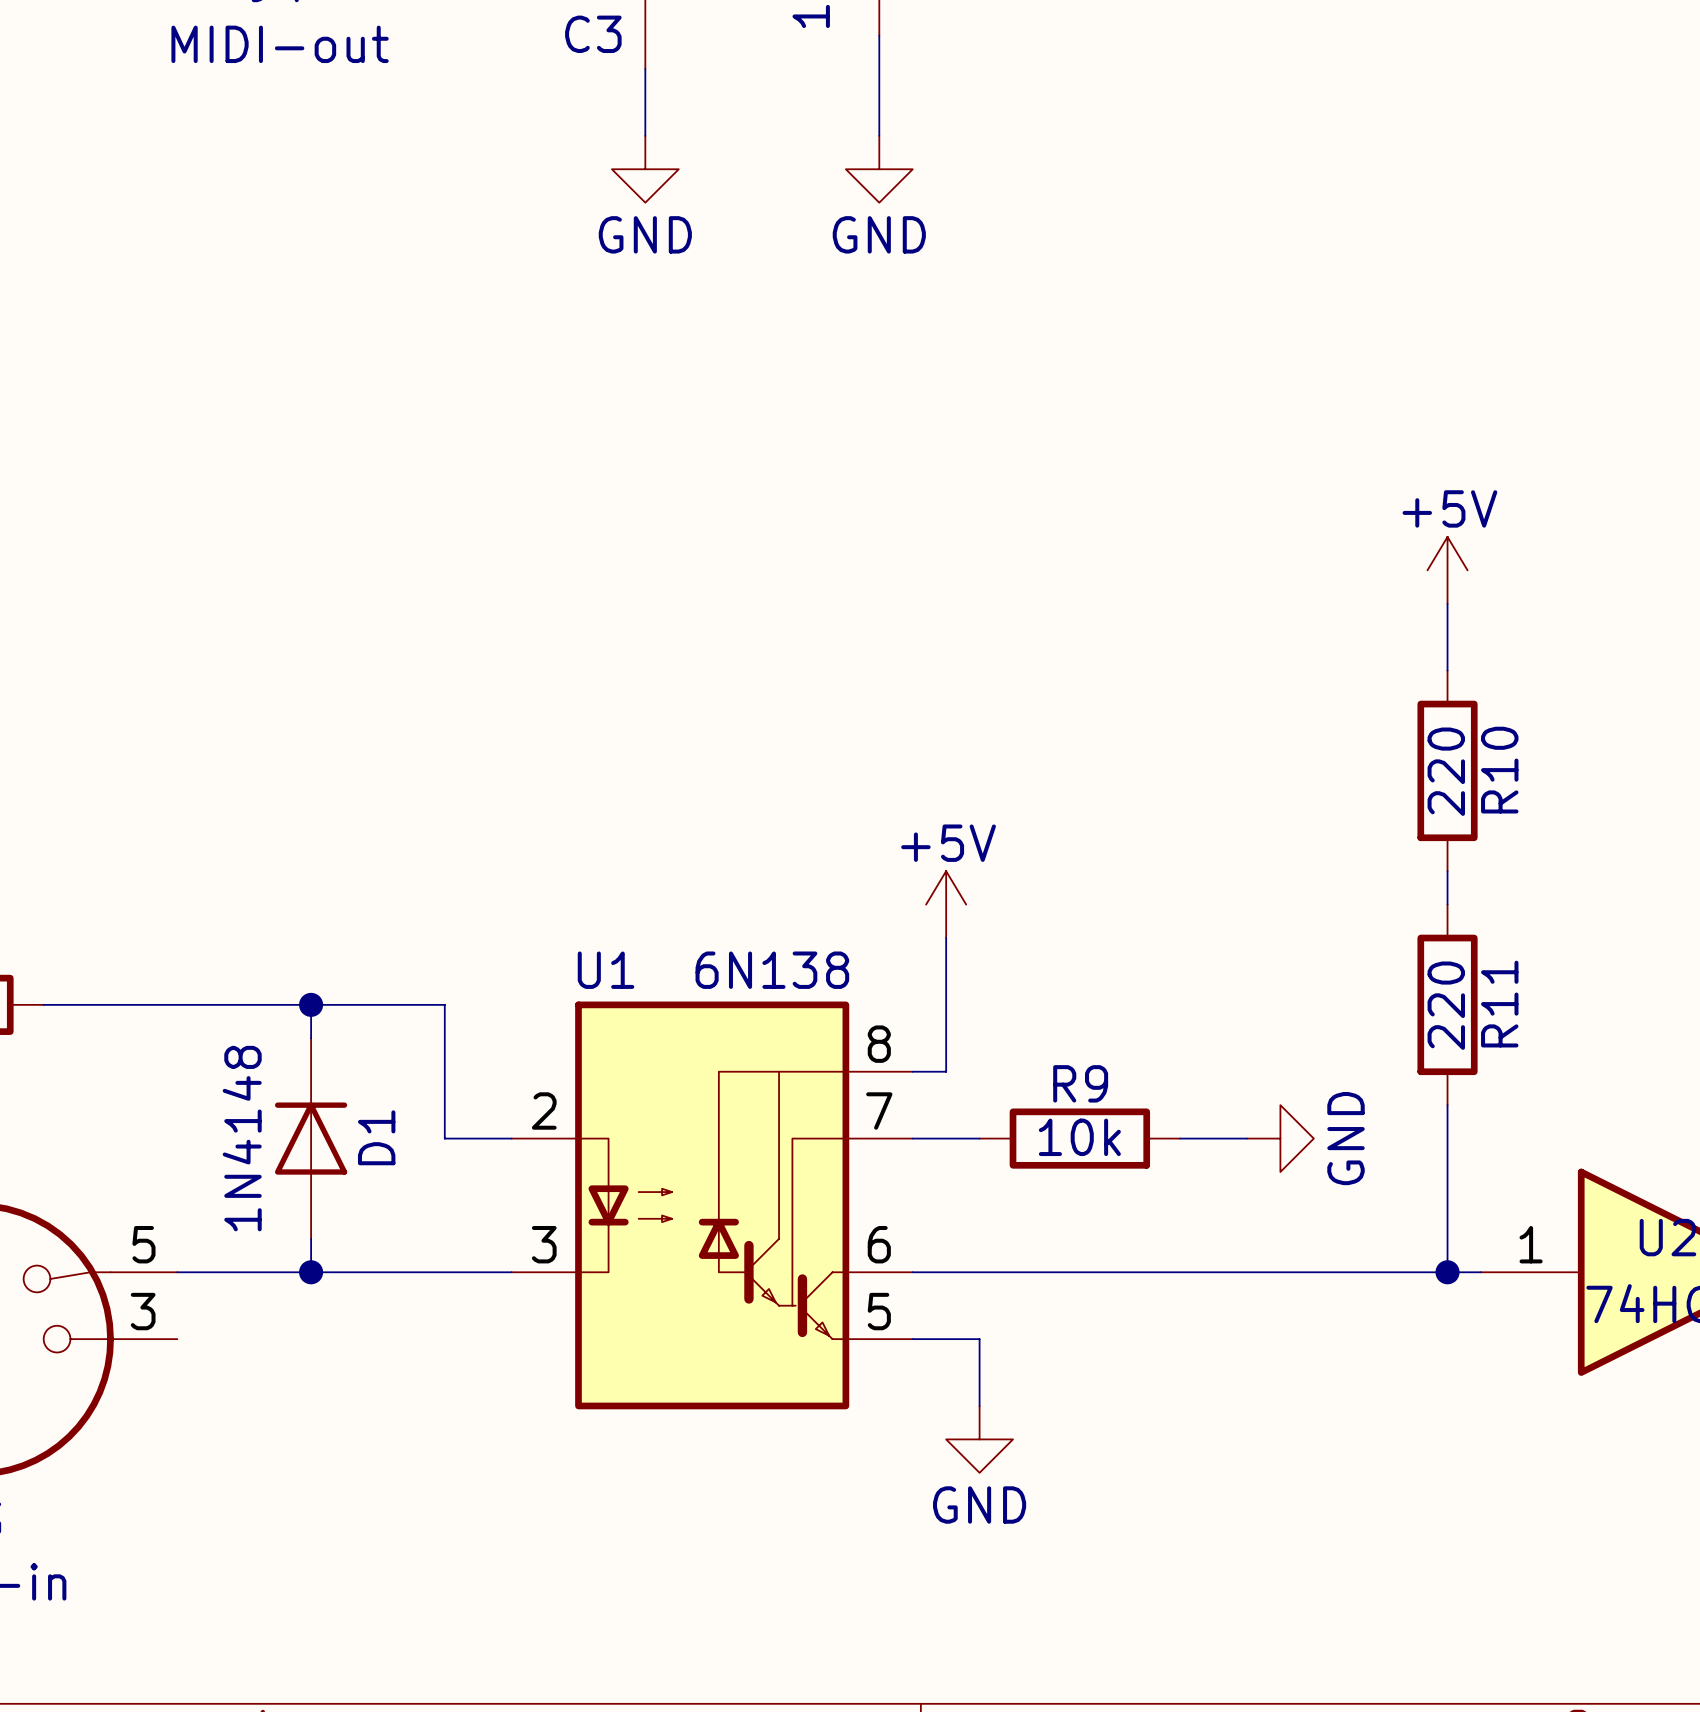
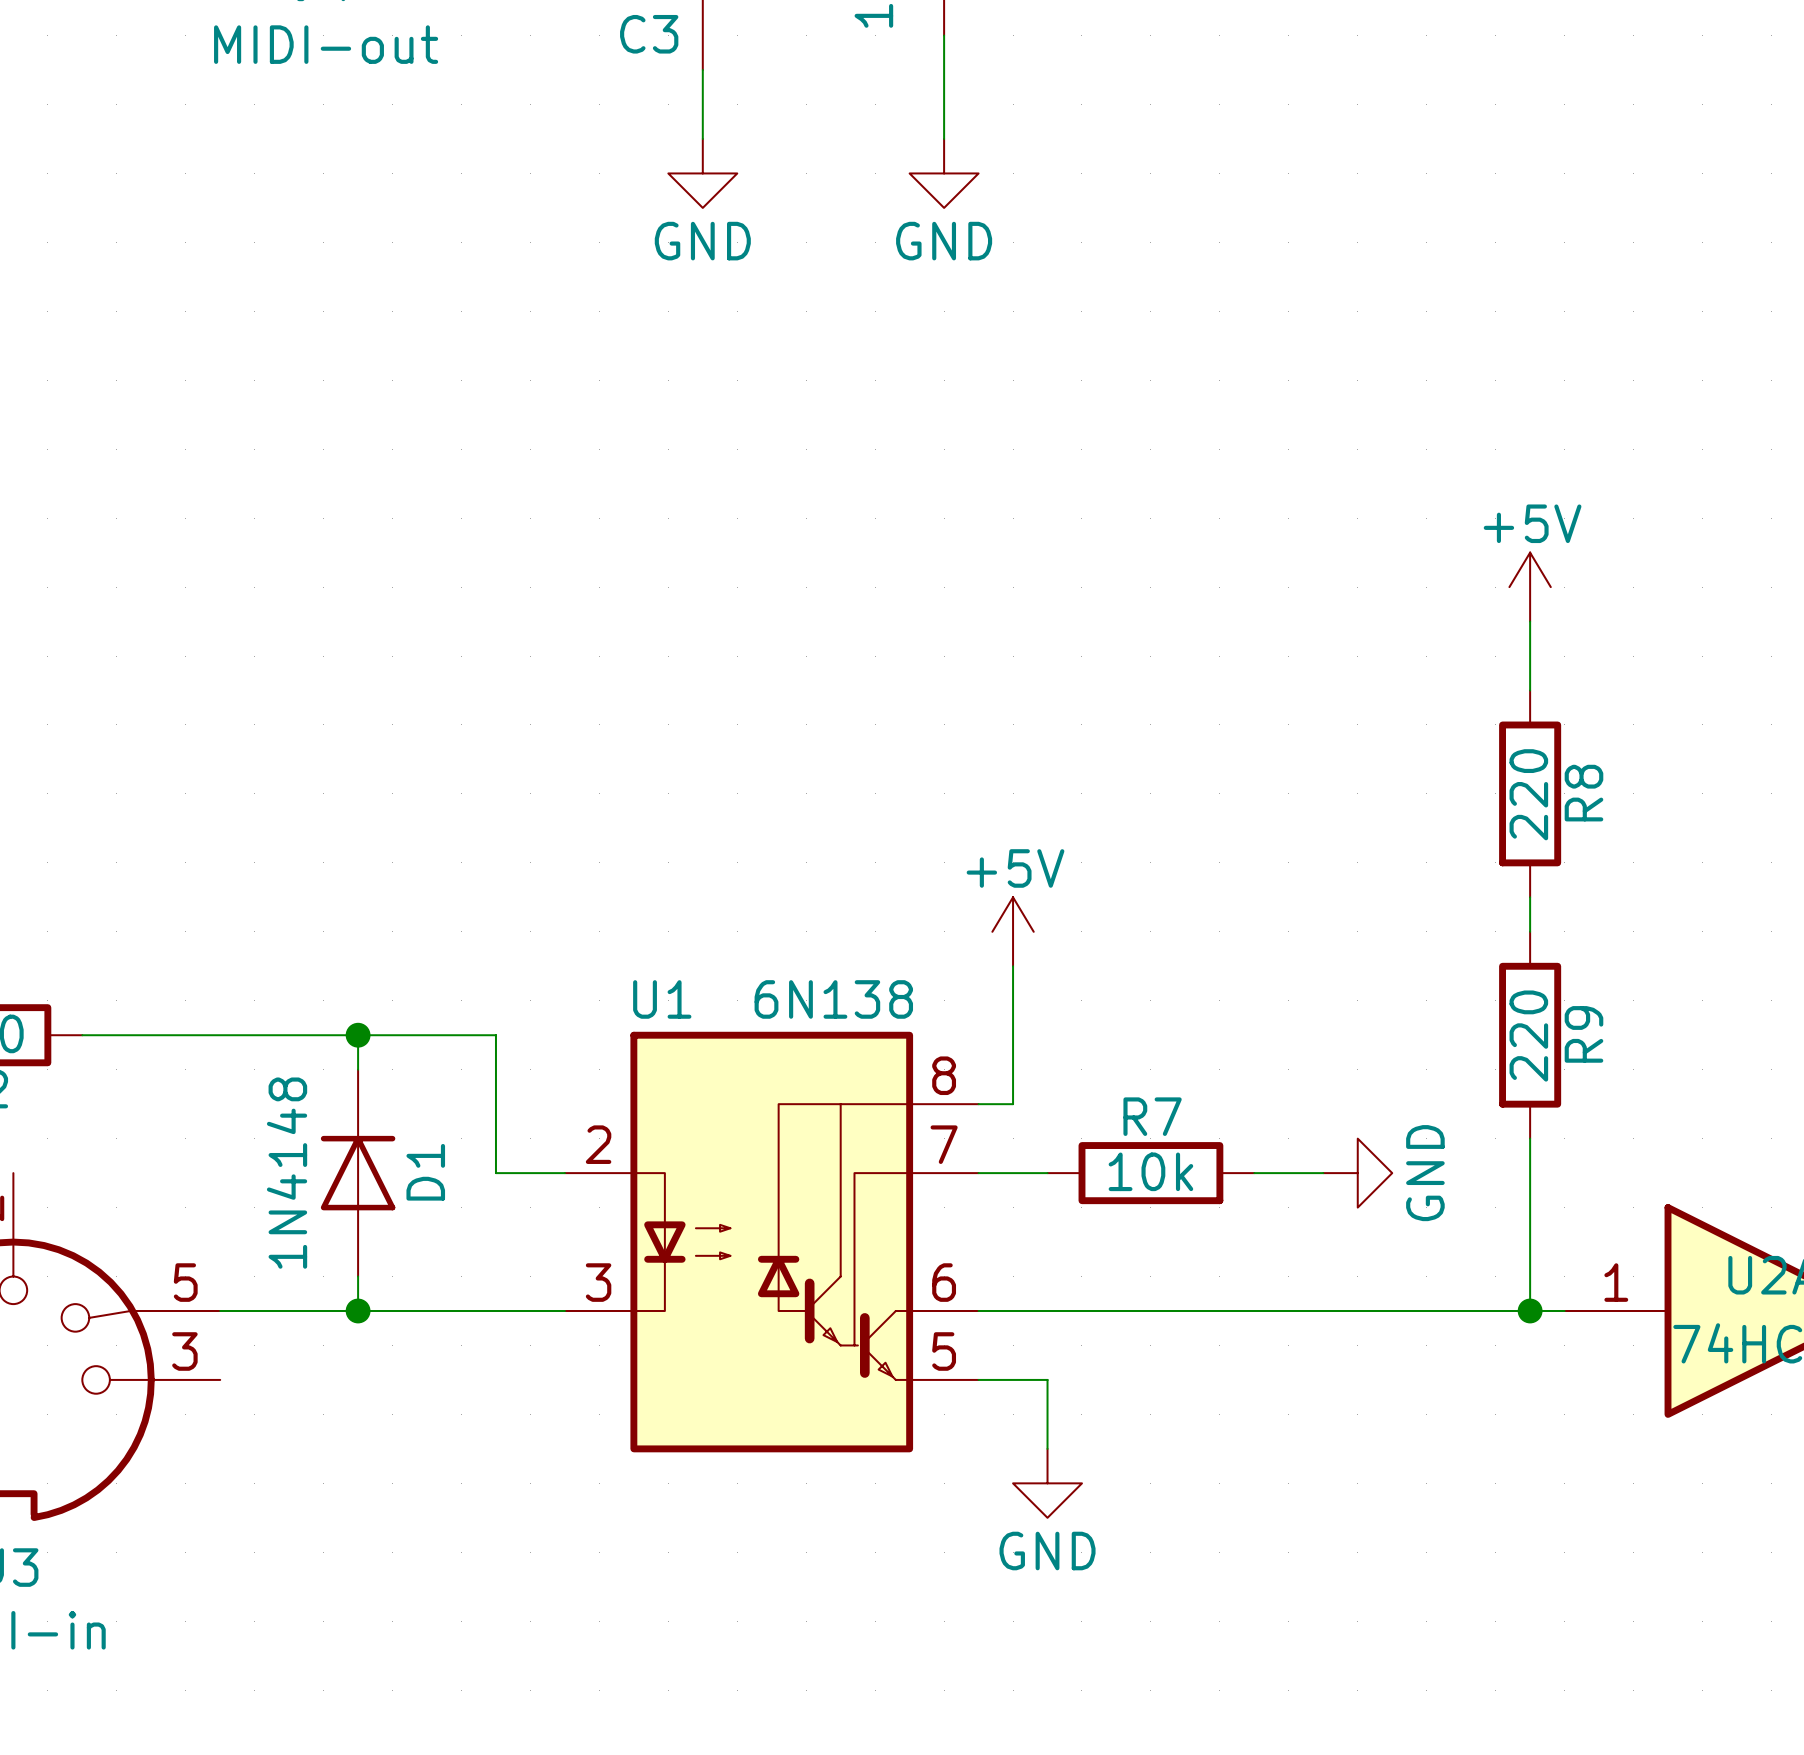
R10 name: R10 (1499, 770) -> R8 (1583, 793)
R11 name: R11 (1499, 1004) -> R9 (1583, 1034)
R9 name: R9 (1080, 1083) -> R7 (1152, 1116)

